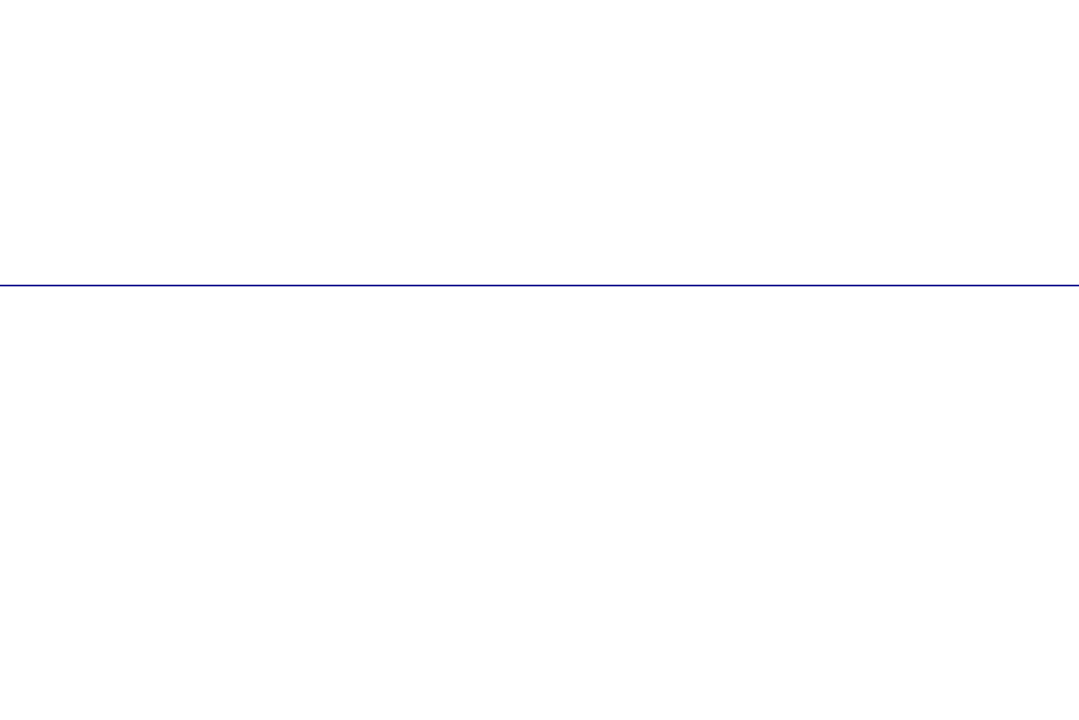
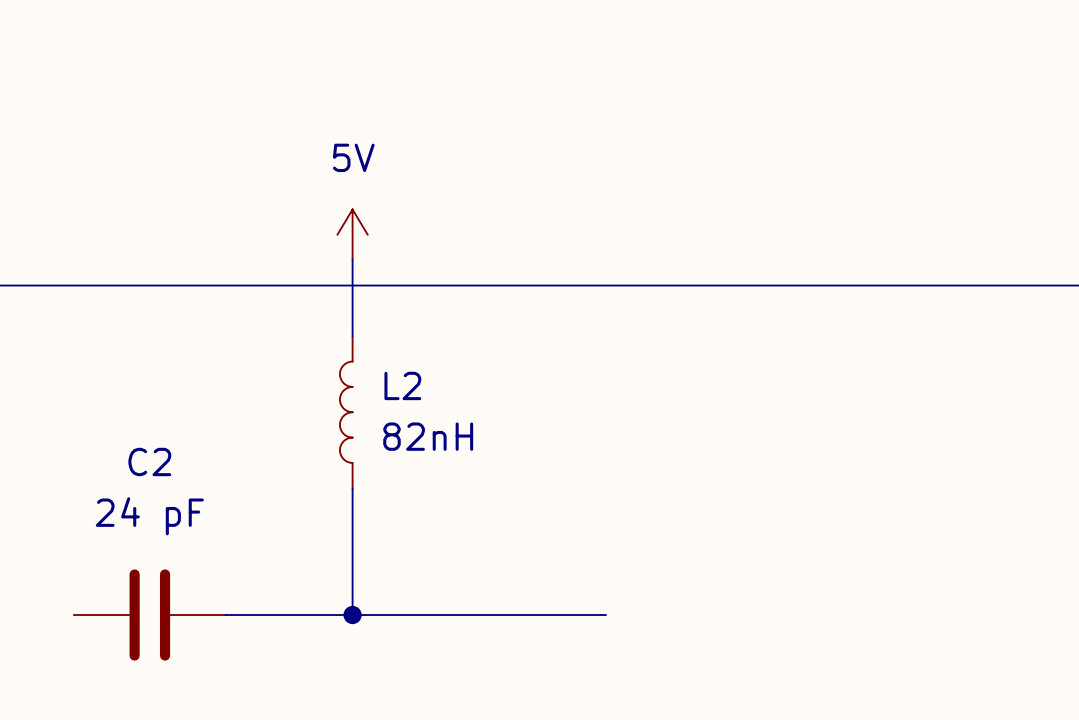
power symbol: none -> 5V (352, 234)
wire: none -> (352, 260) (352, 336)
L2: none -> 82nH (346, 412)
wire: none -> (352, 488) (352, 615)
C2: none -> 24 pF (149, 615)
wire: none -> (225, 615) (606, 615)
junction: none -> (352, 615)

